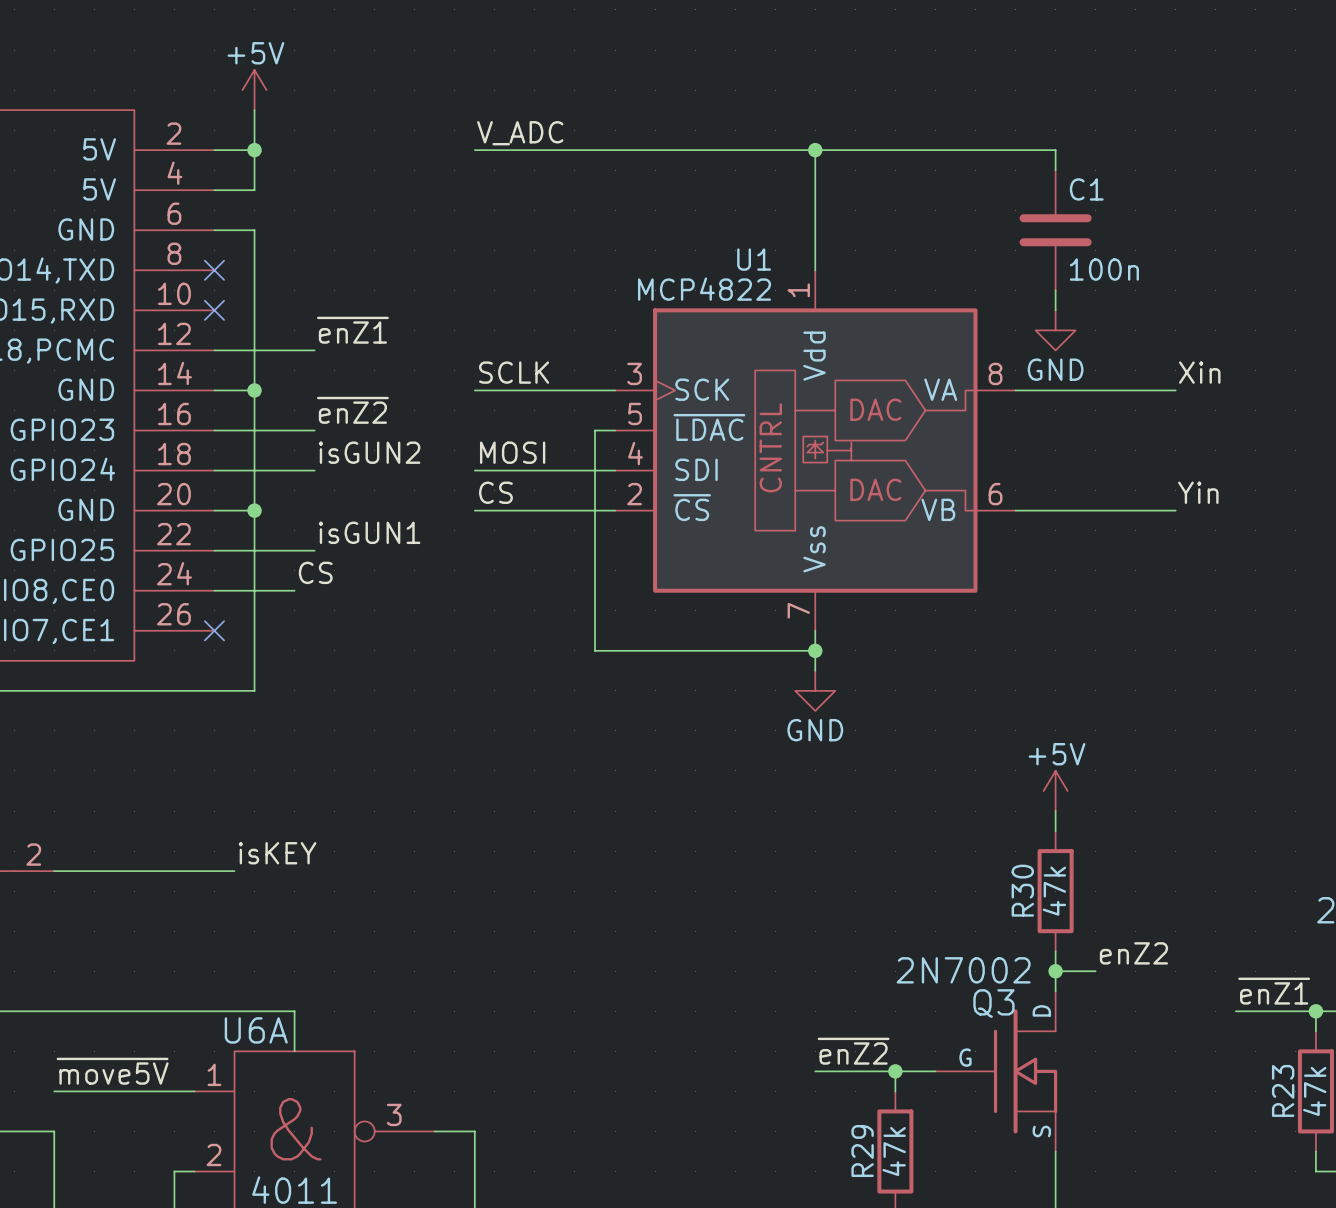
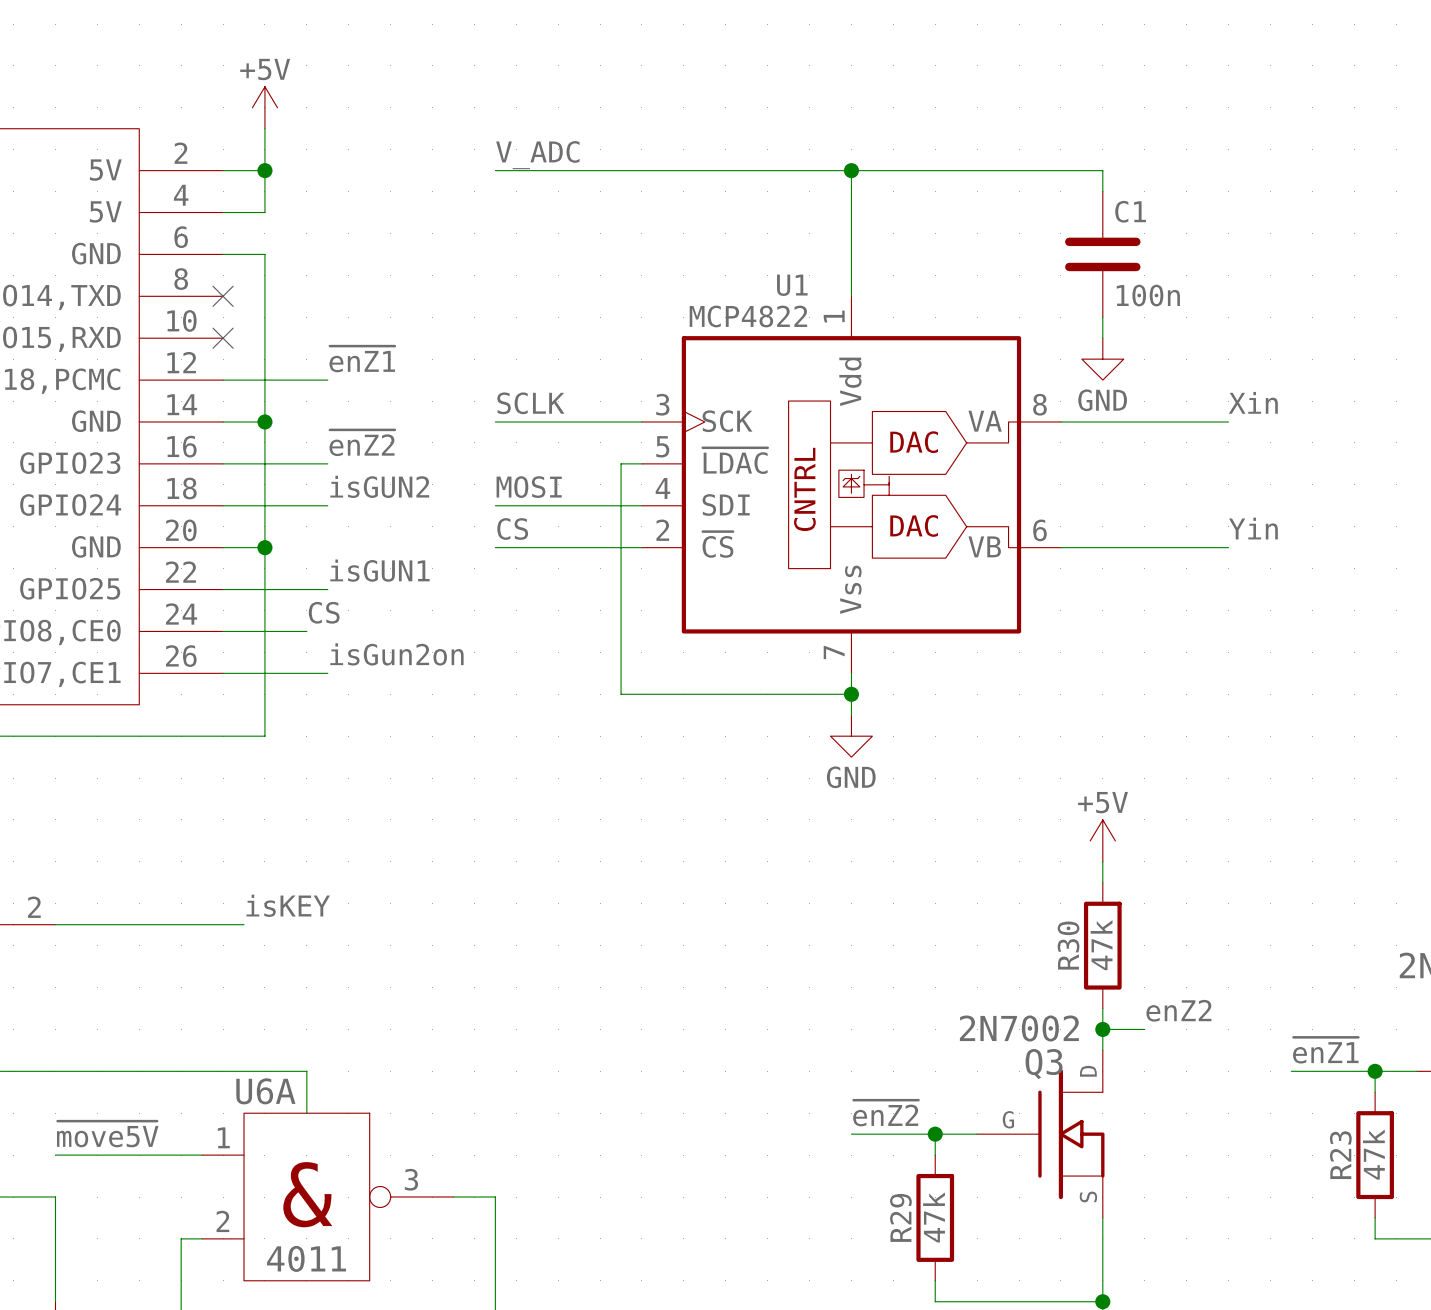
label: none -> isGun2on (396, 654)
wire: none -> (223, 673) (327, 673)
no-connect mark: (214, 630) -> none

